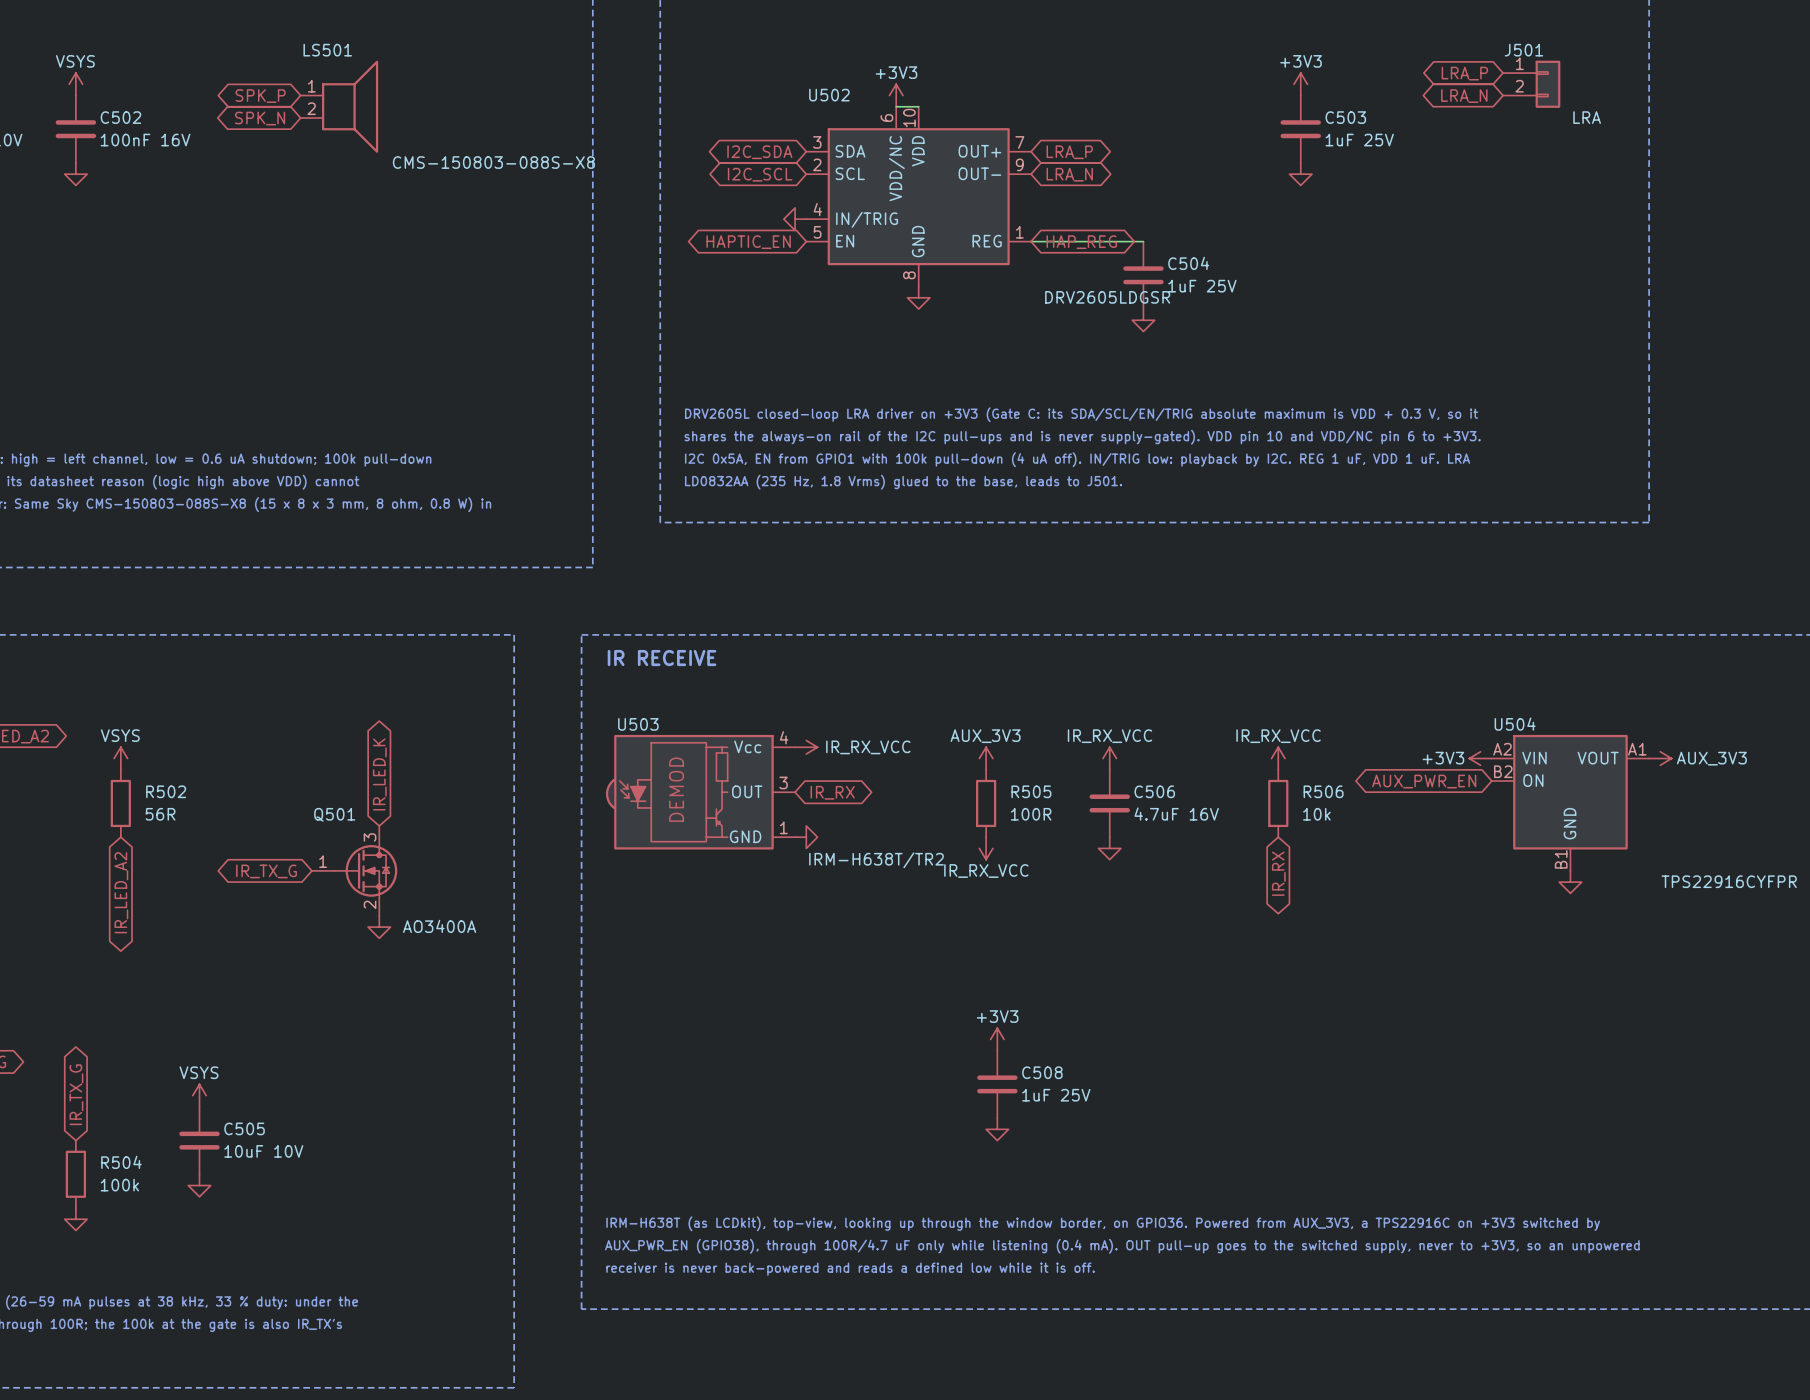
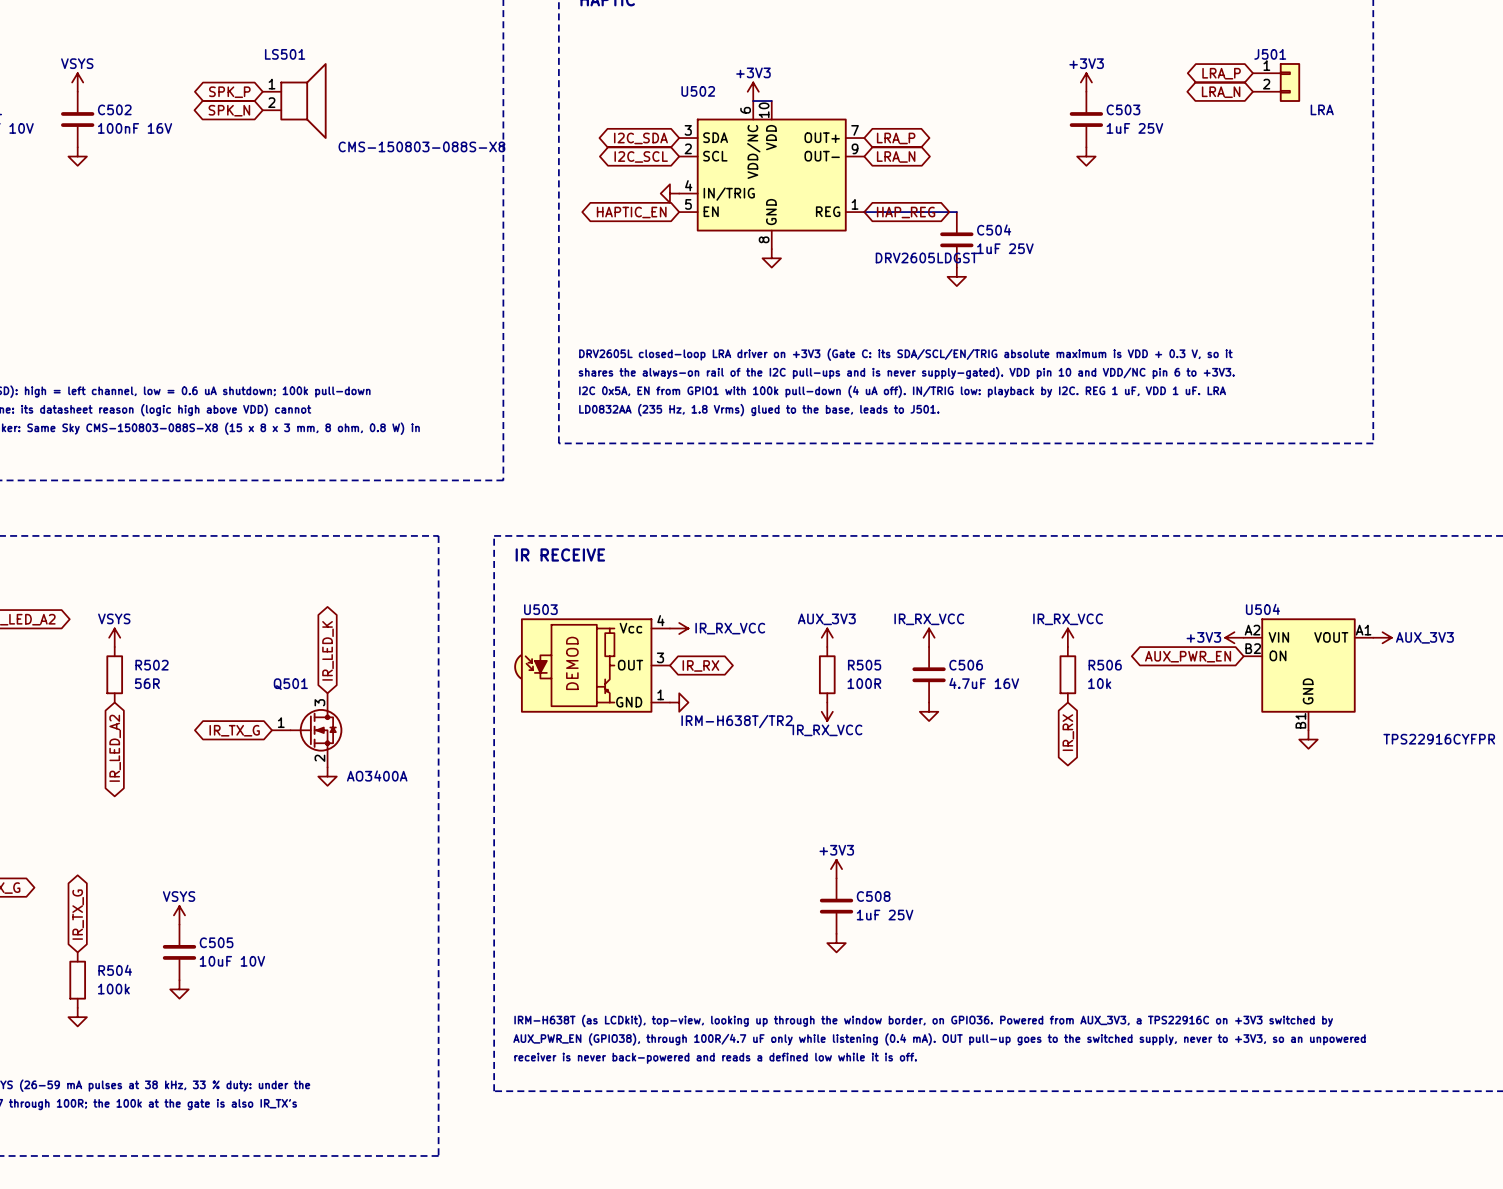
U502 value: DRV2605LDGSR (1107, 297) -> DRV2605LDGST (926, 257)

